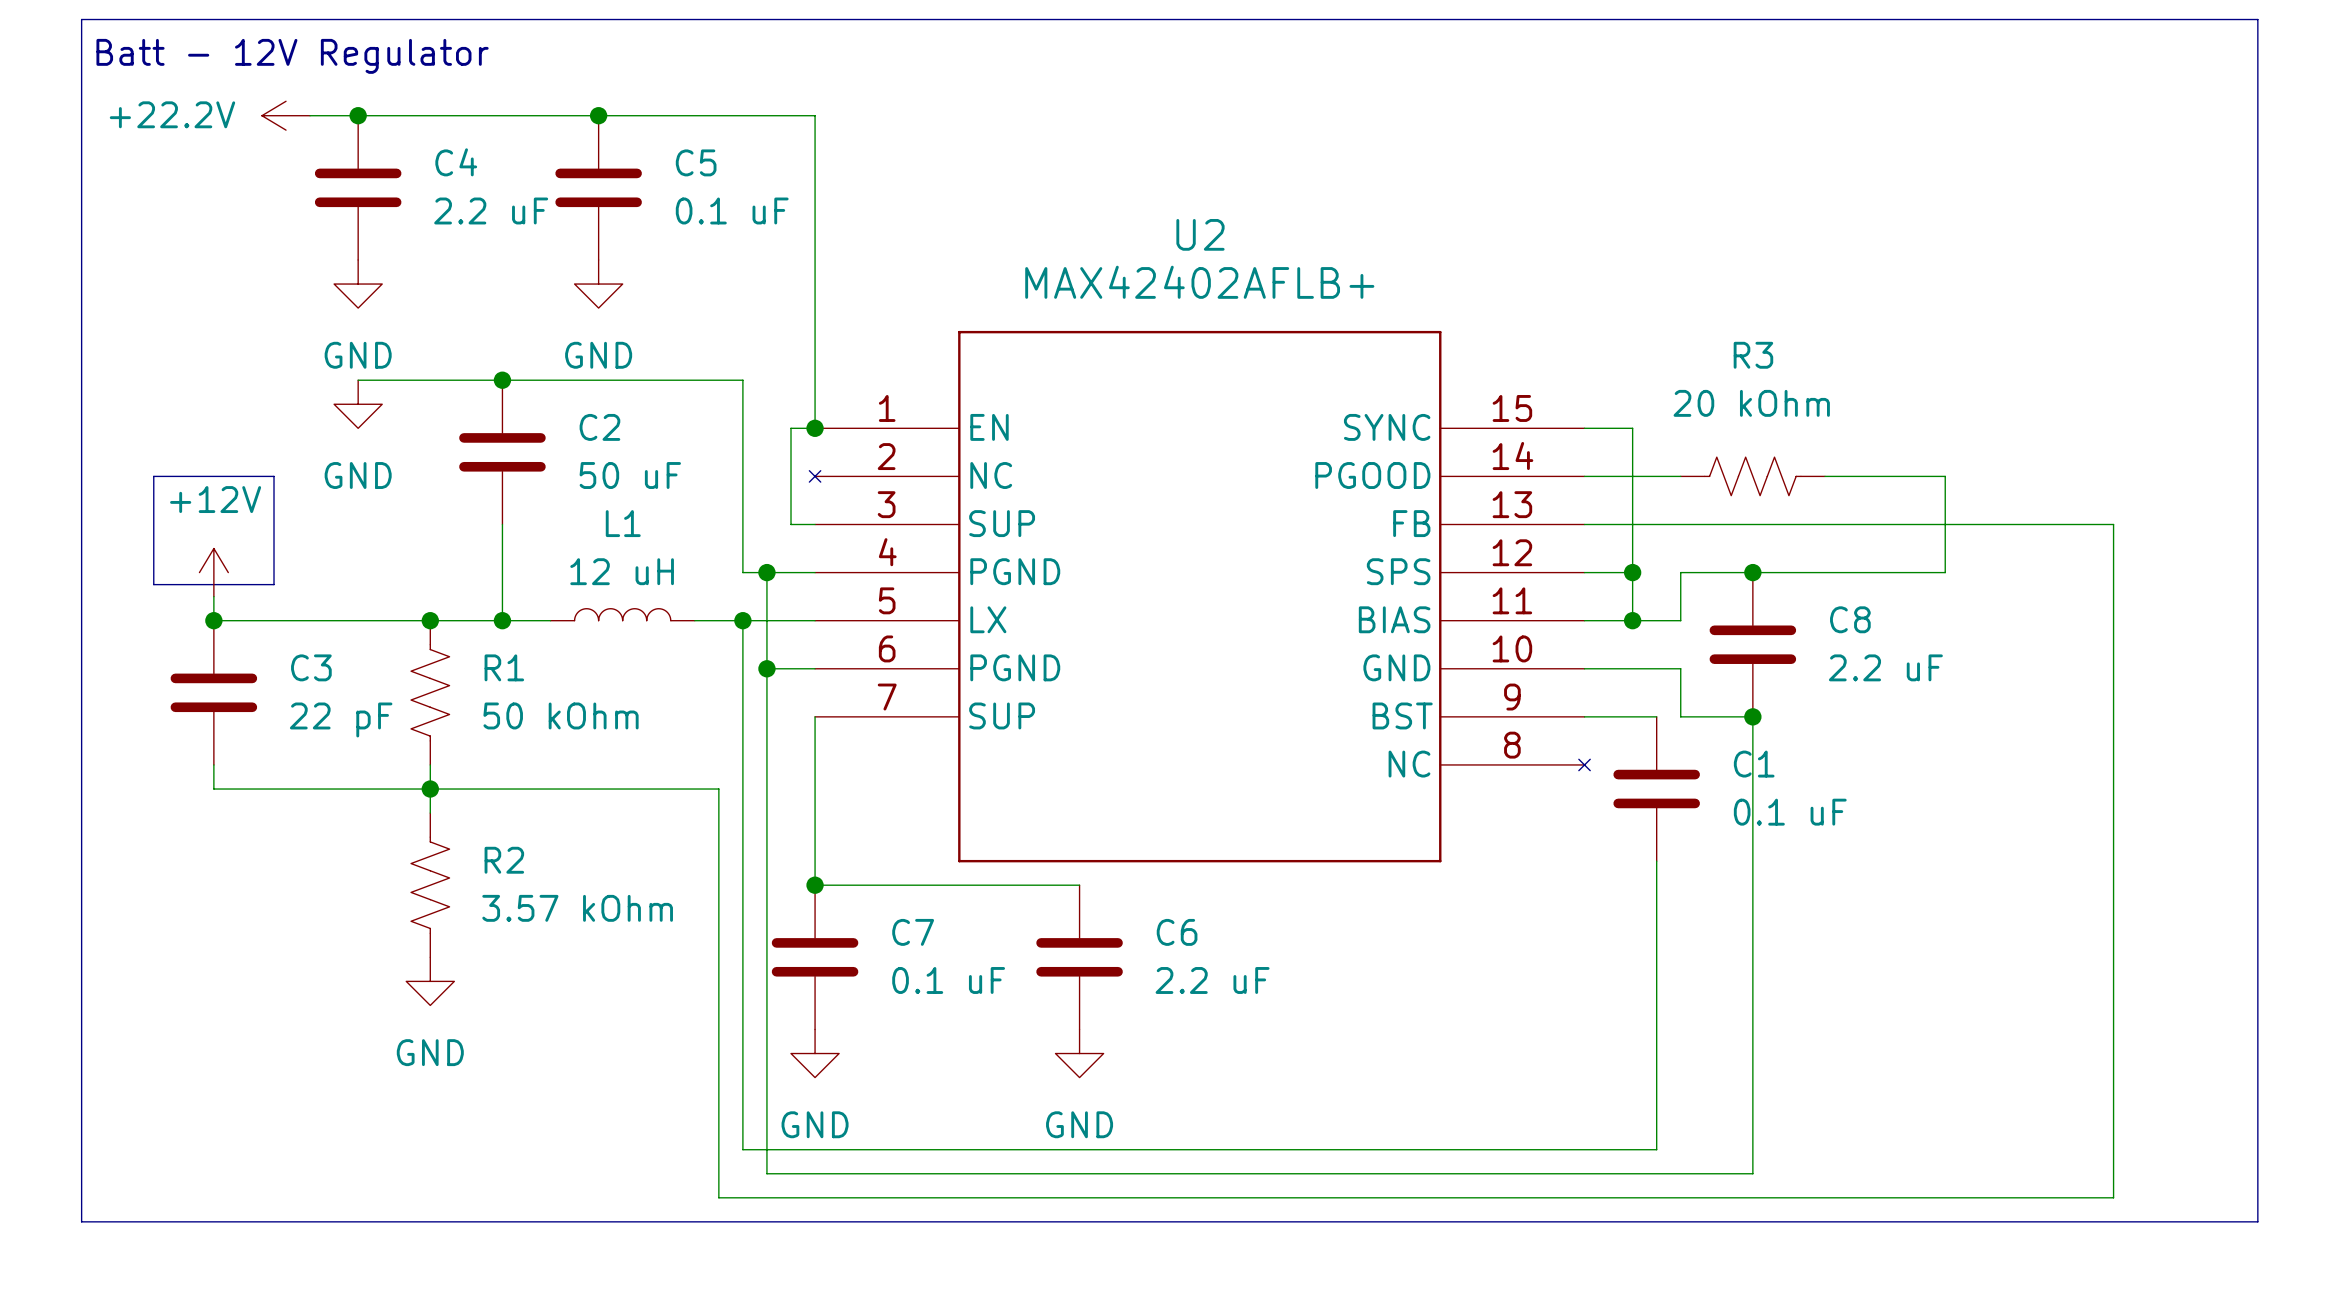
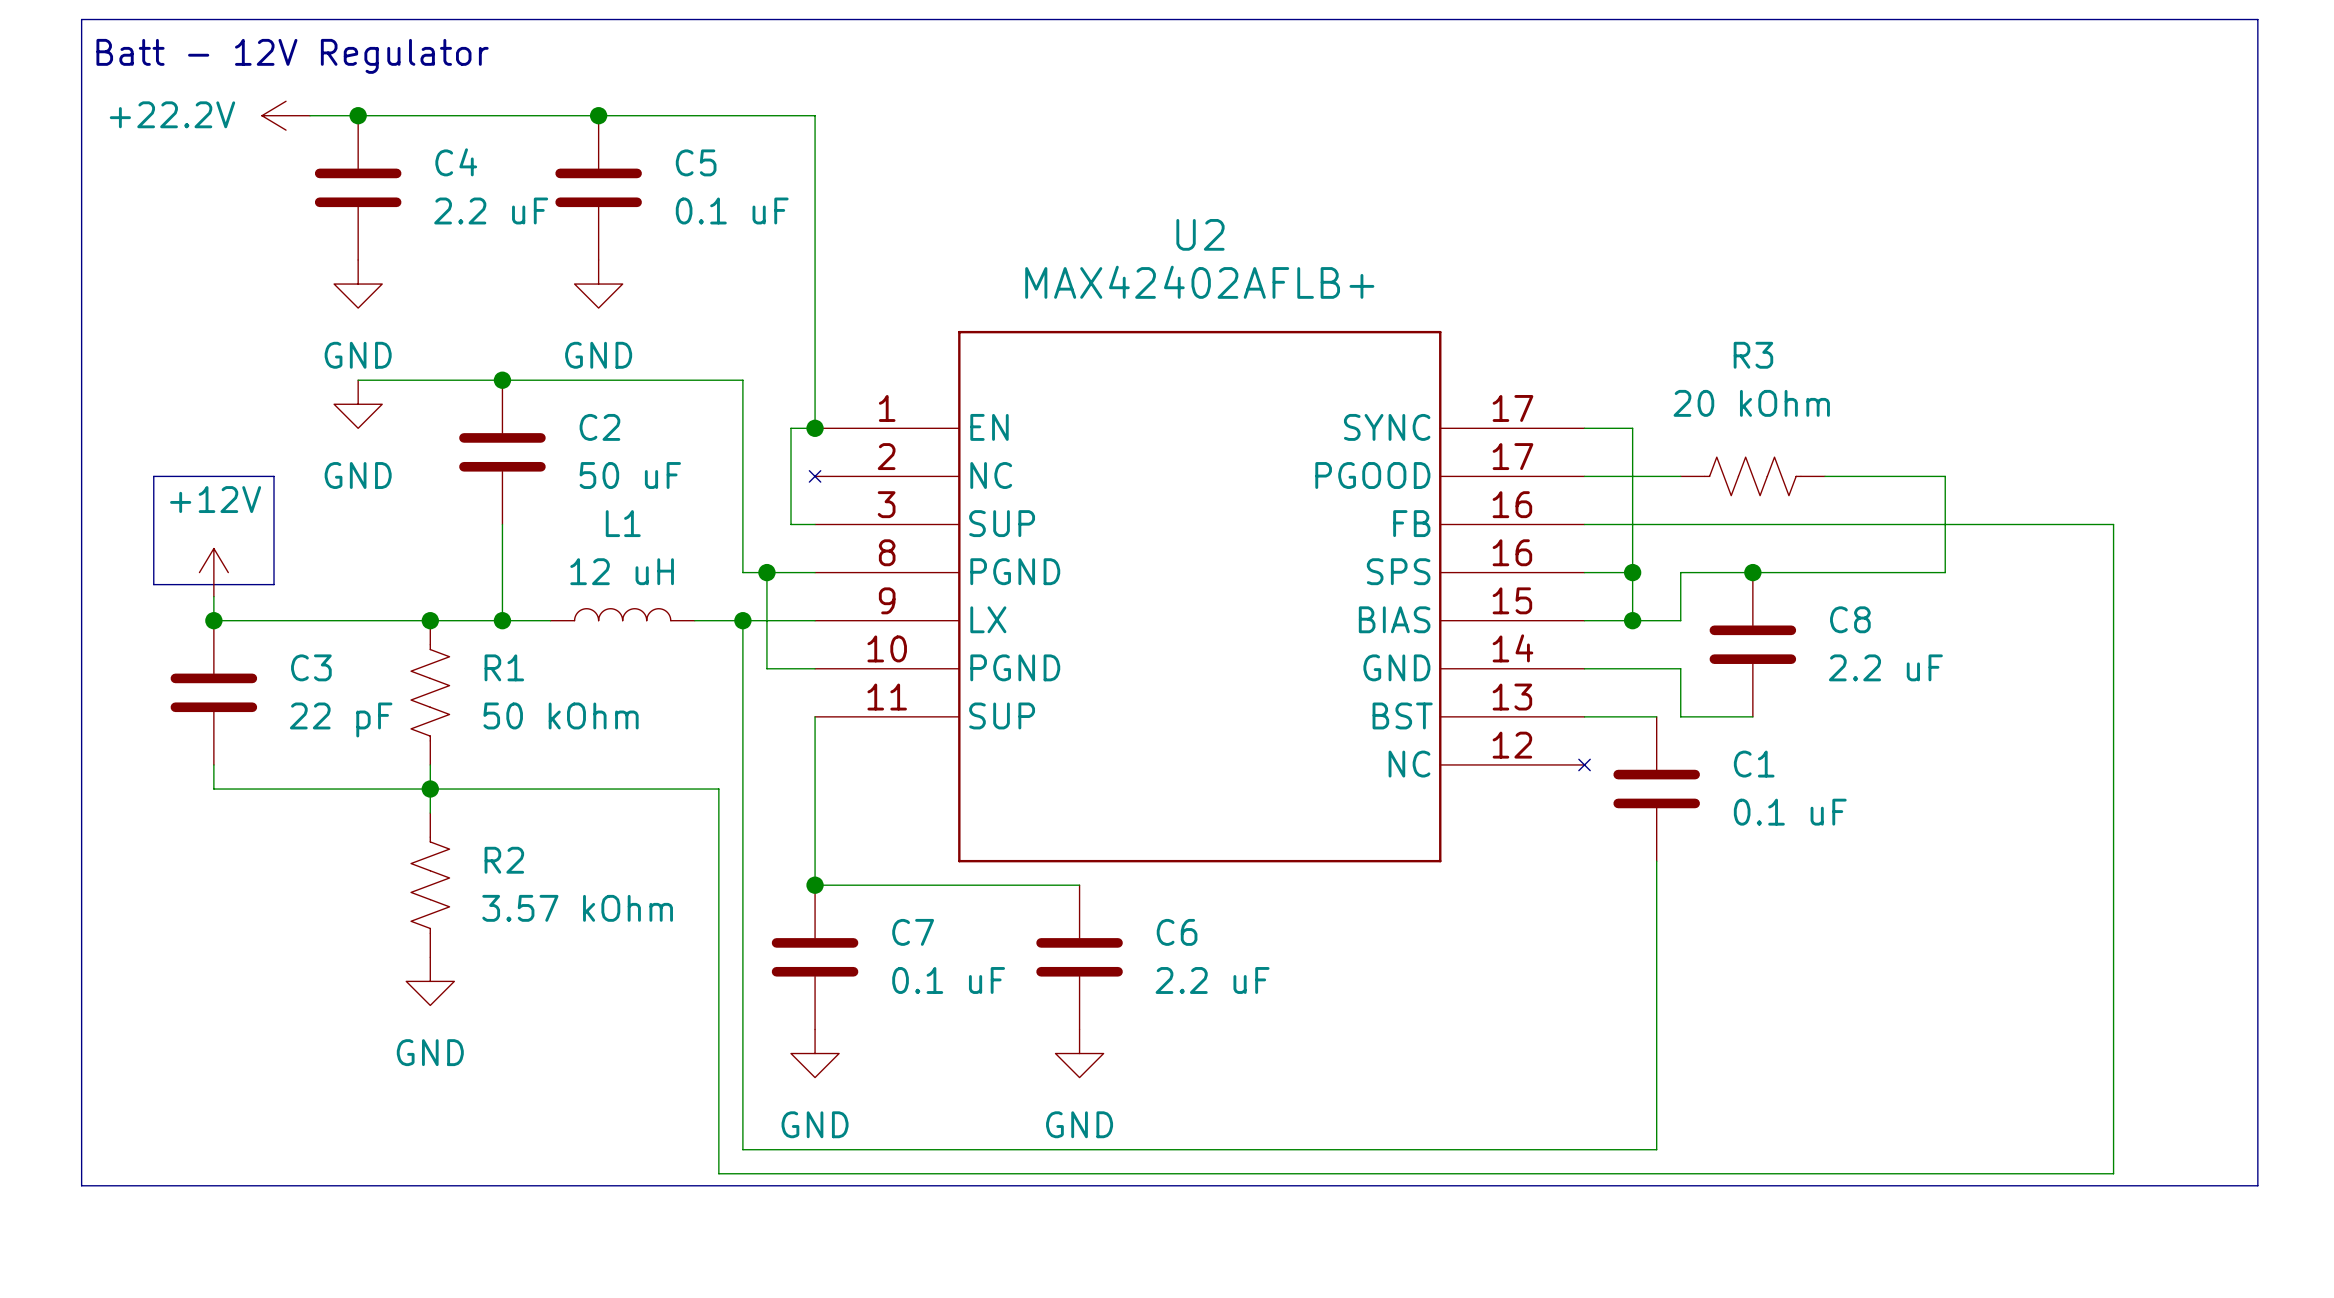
U2 symbol: [809, 330, 1591, 863] -> [809, 330, 1591, 863]
wire: (766, 668) (766, 1173) -> (718, 1173) (766, 1173)
junction: (766, 668) -> none
wire: (1752, 716) (1752, 1173) -> (2113, 1173) (1752, 1173)
junction: (1752, 716) -> none
wire: (718, 1173) (718, 1197) (2113, 1197) (2113, 1173) -> none
line: (81, 1185) (81, 1221) (2257, 1221) (2257, 1185) -> (81, 1185) (2257, 1185)

